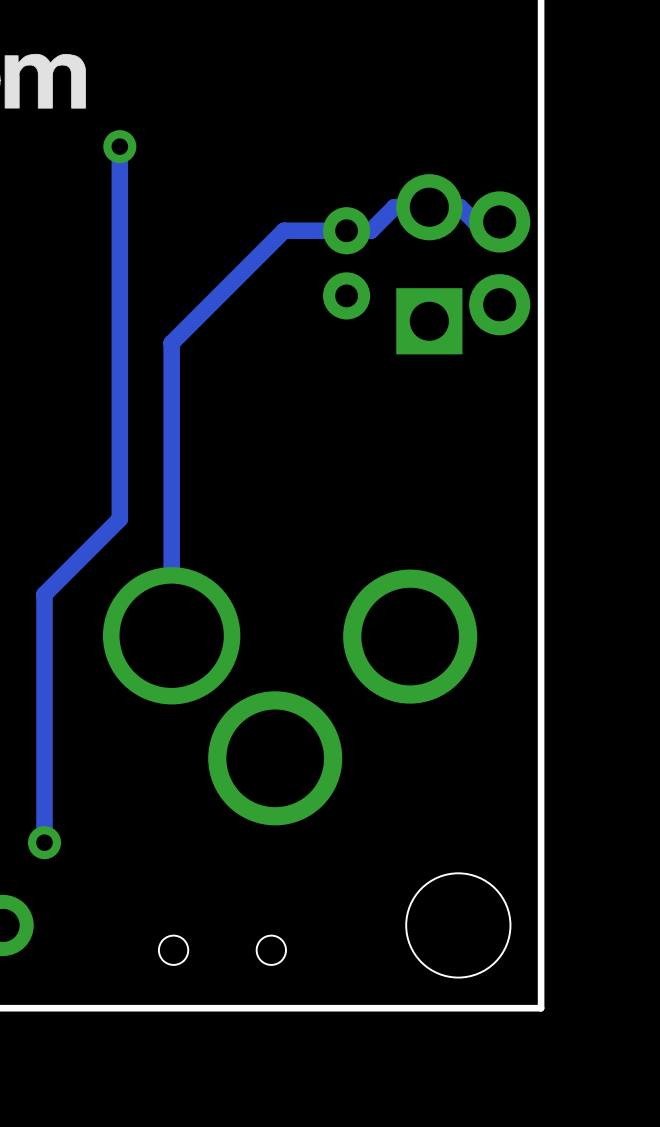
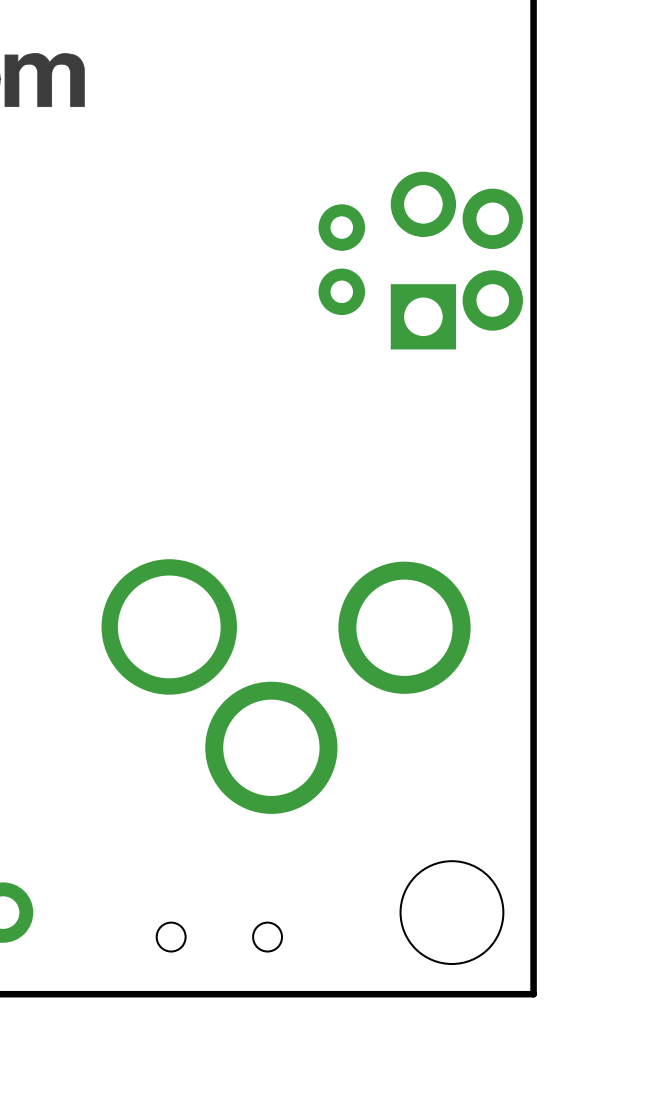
track: (119, 146) (119, 519) (44, 594) (44, 842) -> none
via: (119, 146) -> none
track: (499, 221) (474, 221) (460, 207) (394, 207) (370, 230) (284, 230) (171, 343) (171, 635) -> none
via: (44, 842) -> none

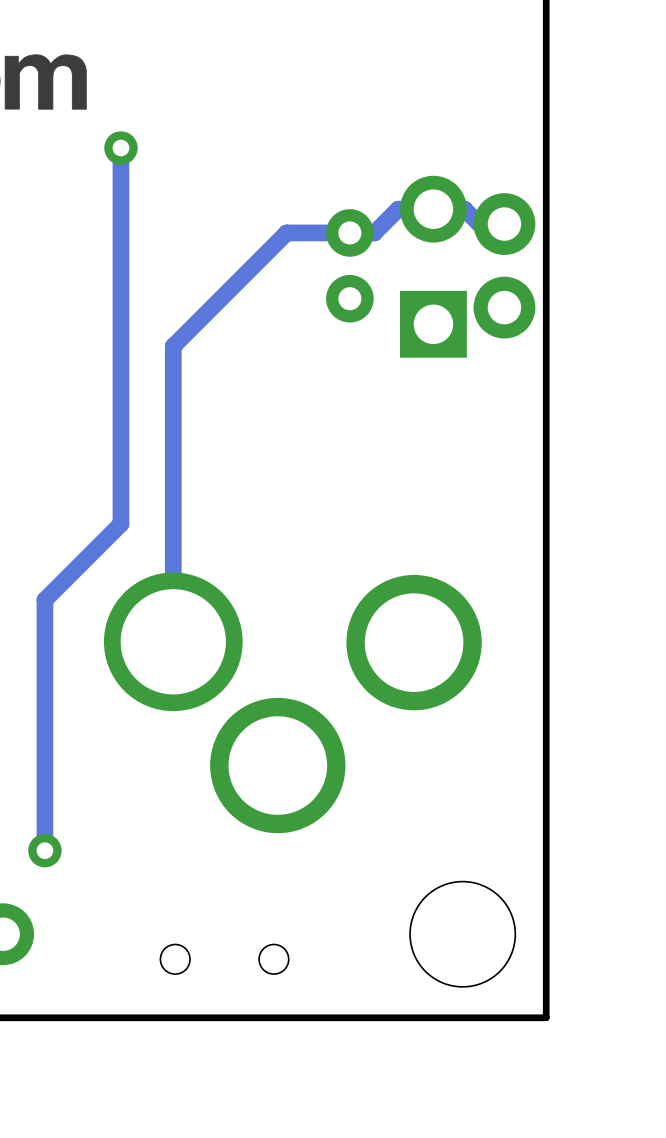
track: none -> (120, 148) (120, 524) (44, 600) (44, 850)
via: none -> (120, 148)
track: none -> (504, 224) (479, 224) (464, 209) (398, 209) (374, 232) (286, 232) (173, 346) (173, 641)
via: none -> (44, 850)

